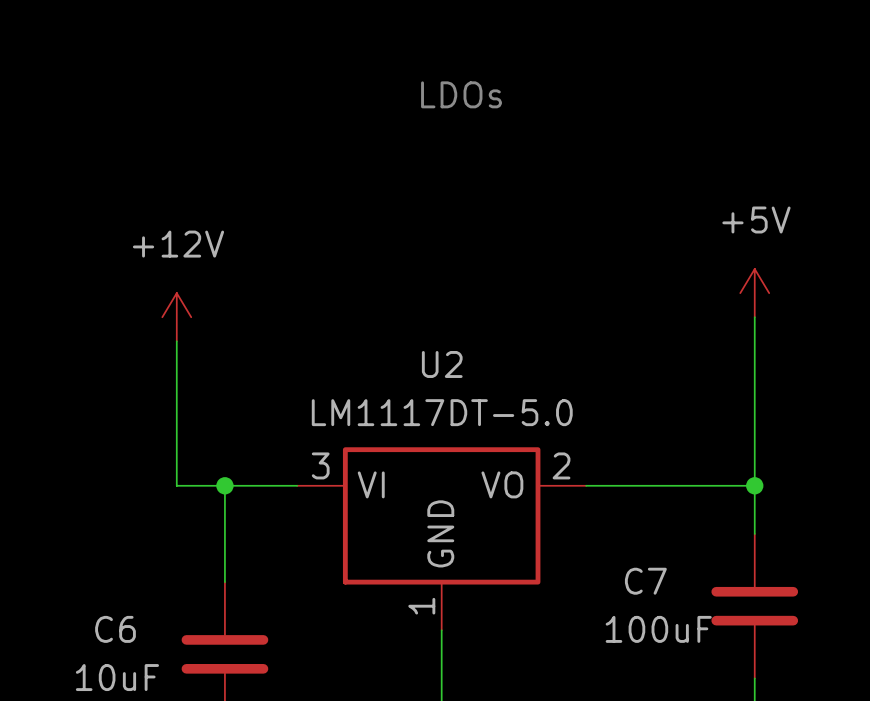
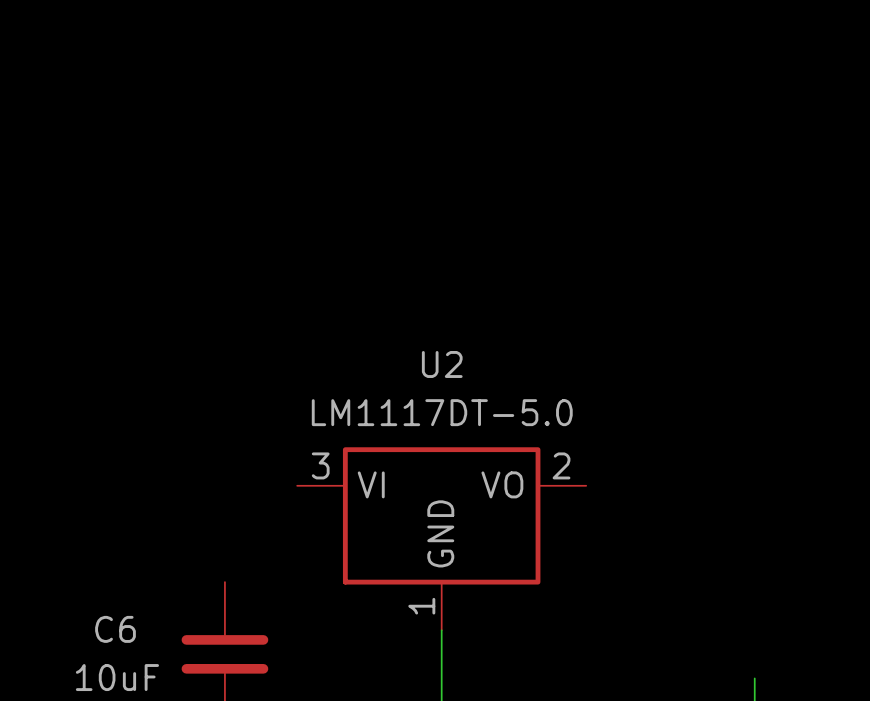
text: LDOs (461, 94) -> none
power symbol: +5V (754, 293) -> none
power symbol: +12V (176, 317) -> none
wire: (754, 317) (754, 533) -> none
wire: (176, 341) (176, 485) (297, 485) -> none
wire: (224, 485) (224, 582) -> none
junction: (224, 485) -> none
wire: (586, 485) (754, 485) -> none
junction: (754, 485) -> none
C7: 100uF (754, 606) -> none

